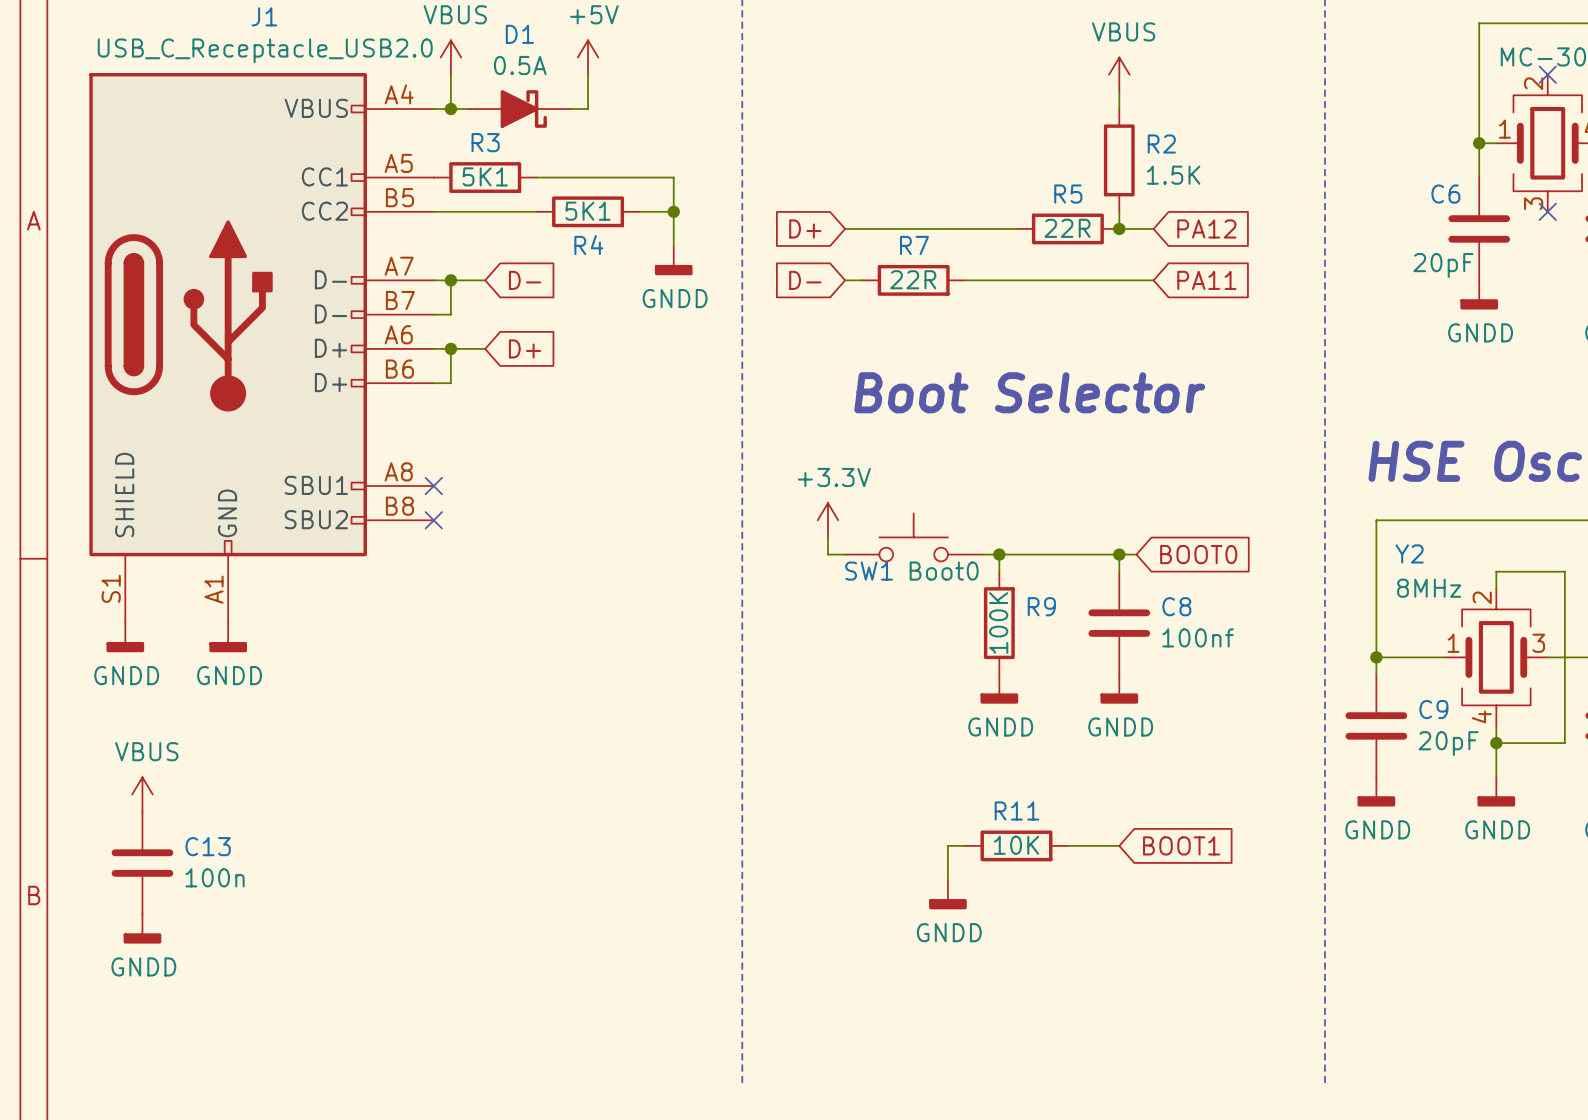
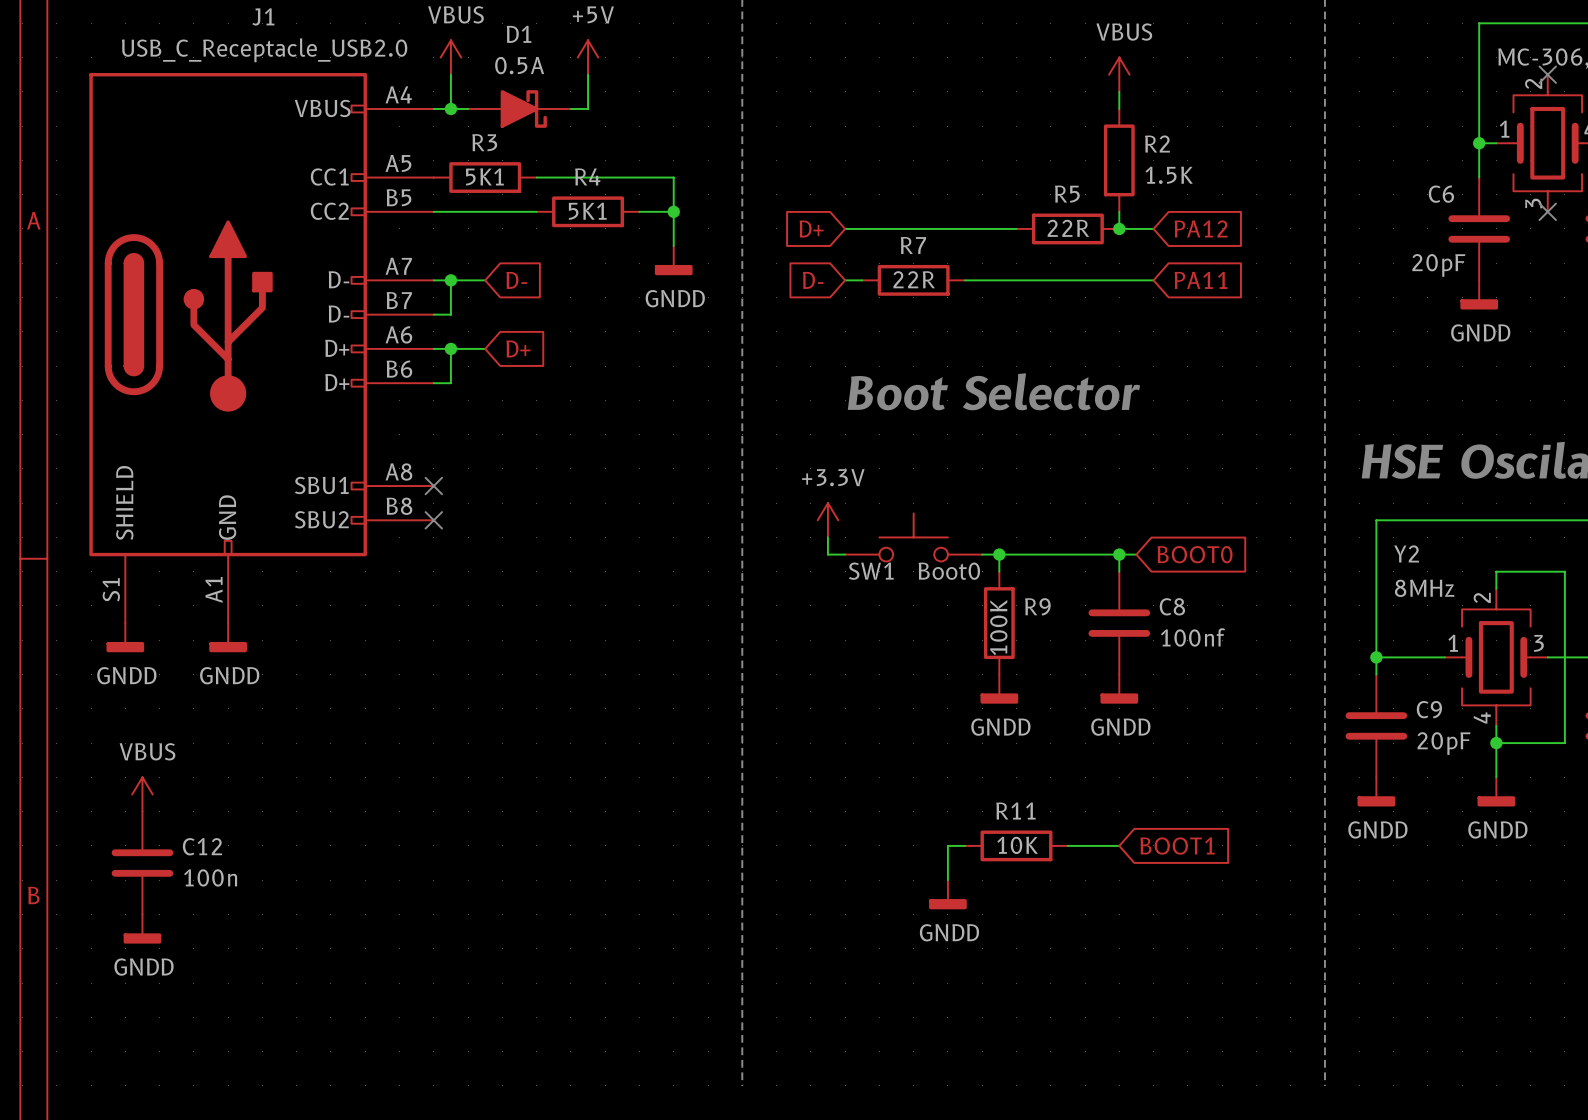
R4 name position: R4 (588, 245) -> R4 (587, 176)
C13 name: C13 (208, 846) -> C12 (202, 846)

